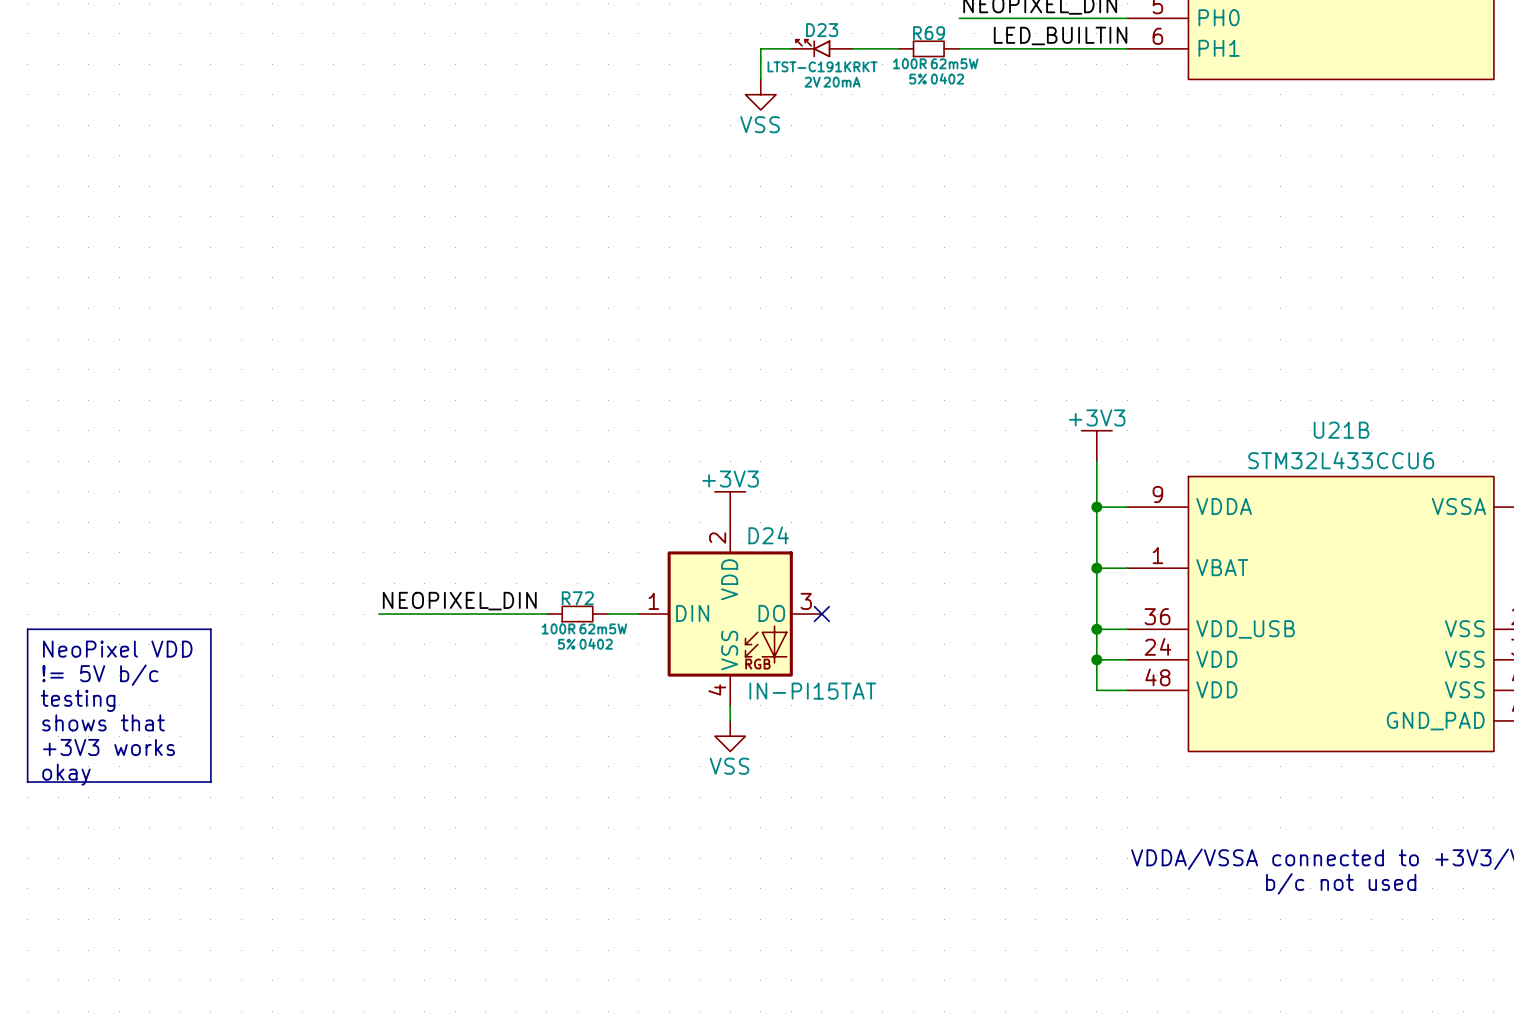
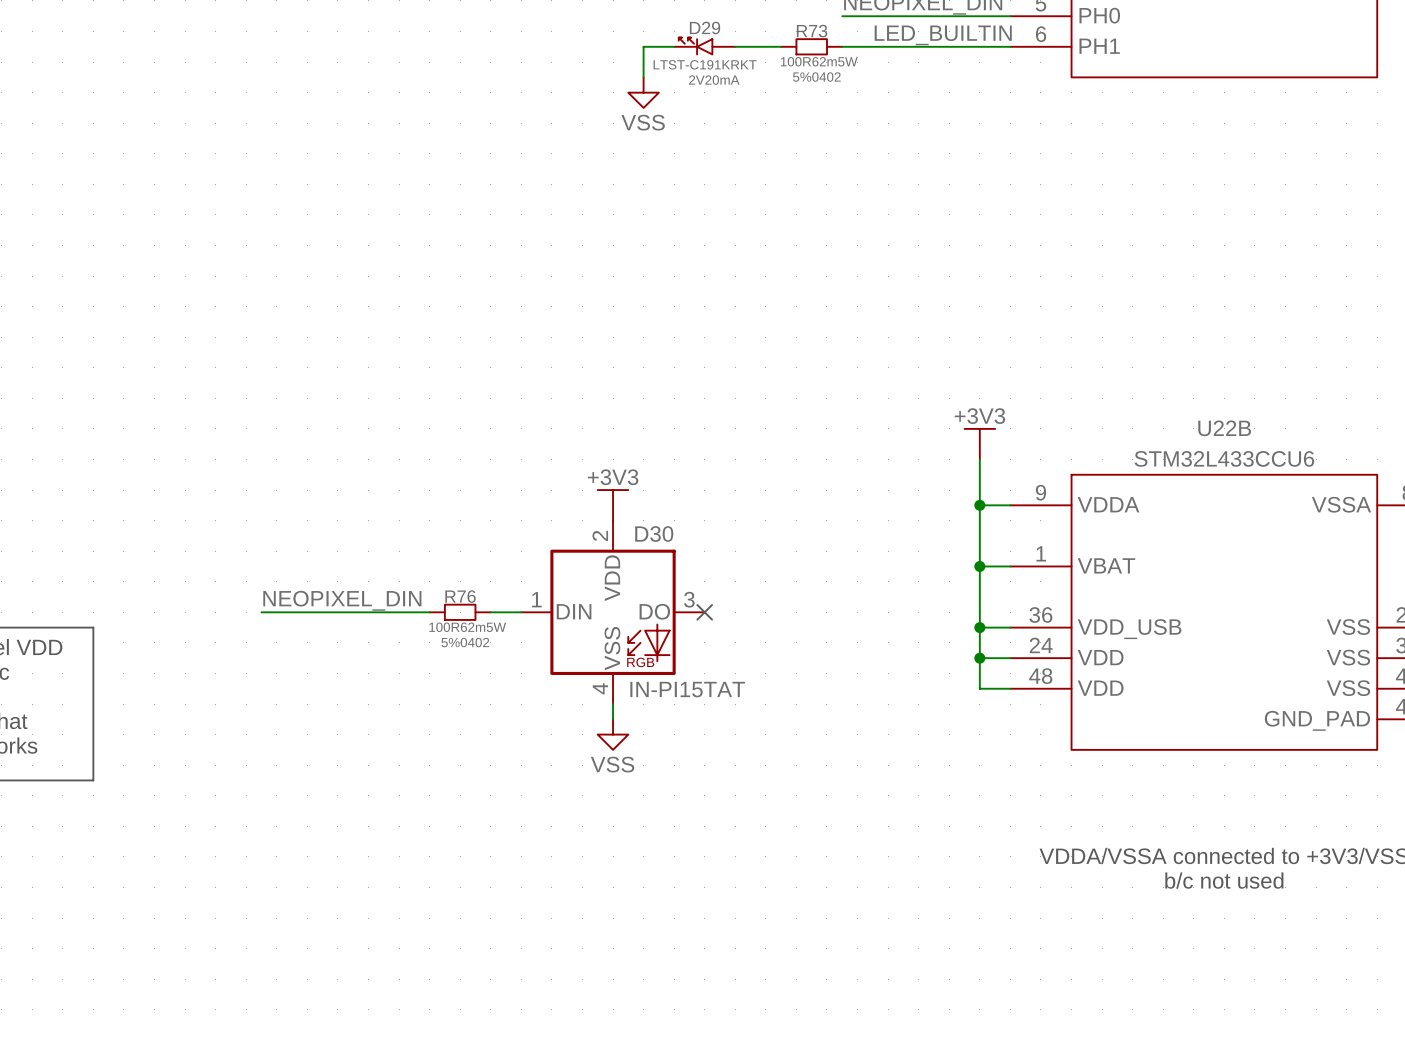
D23 name: D23 (822, 30) -> D29 (705, 28)
R69 name: R69 (929, 33) -> R73 (812, 31)
U21B name: U21B (1341, 430) -> U22B (1224, 428)
D24 name: D24 (768, 535) -> D30 (654, 534)
R72 name: R72 (577, 598) -> R76 (460, 596)

